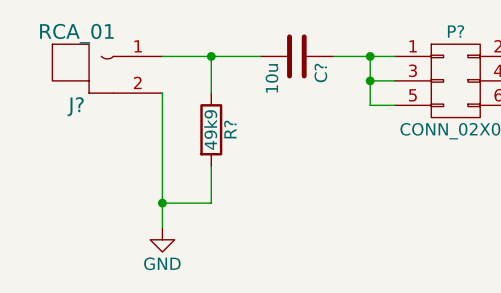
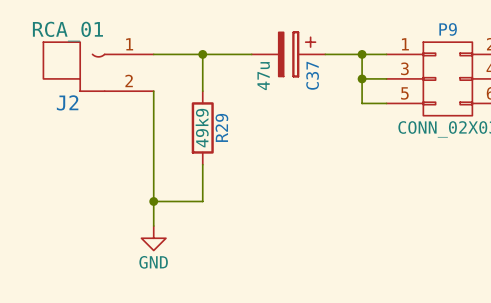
P? name: P? (456, 31) -> P9 (448, 29)
C?: 10u (296, 56) -> none
C37: none -> 47u (288, 54)
J? name: J? (75, 106) -> J2 (67, 102)
R? name: R? (230, 129) -> R29 (221, 127)

